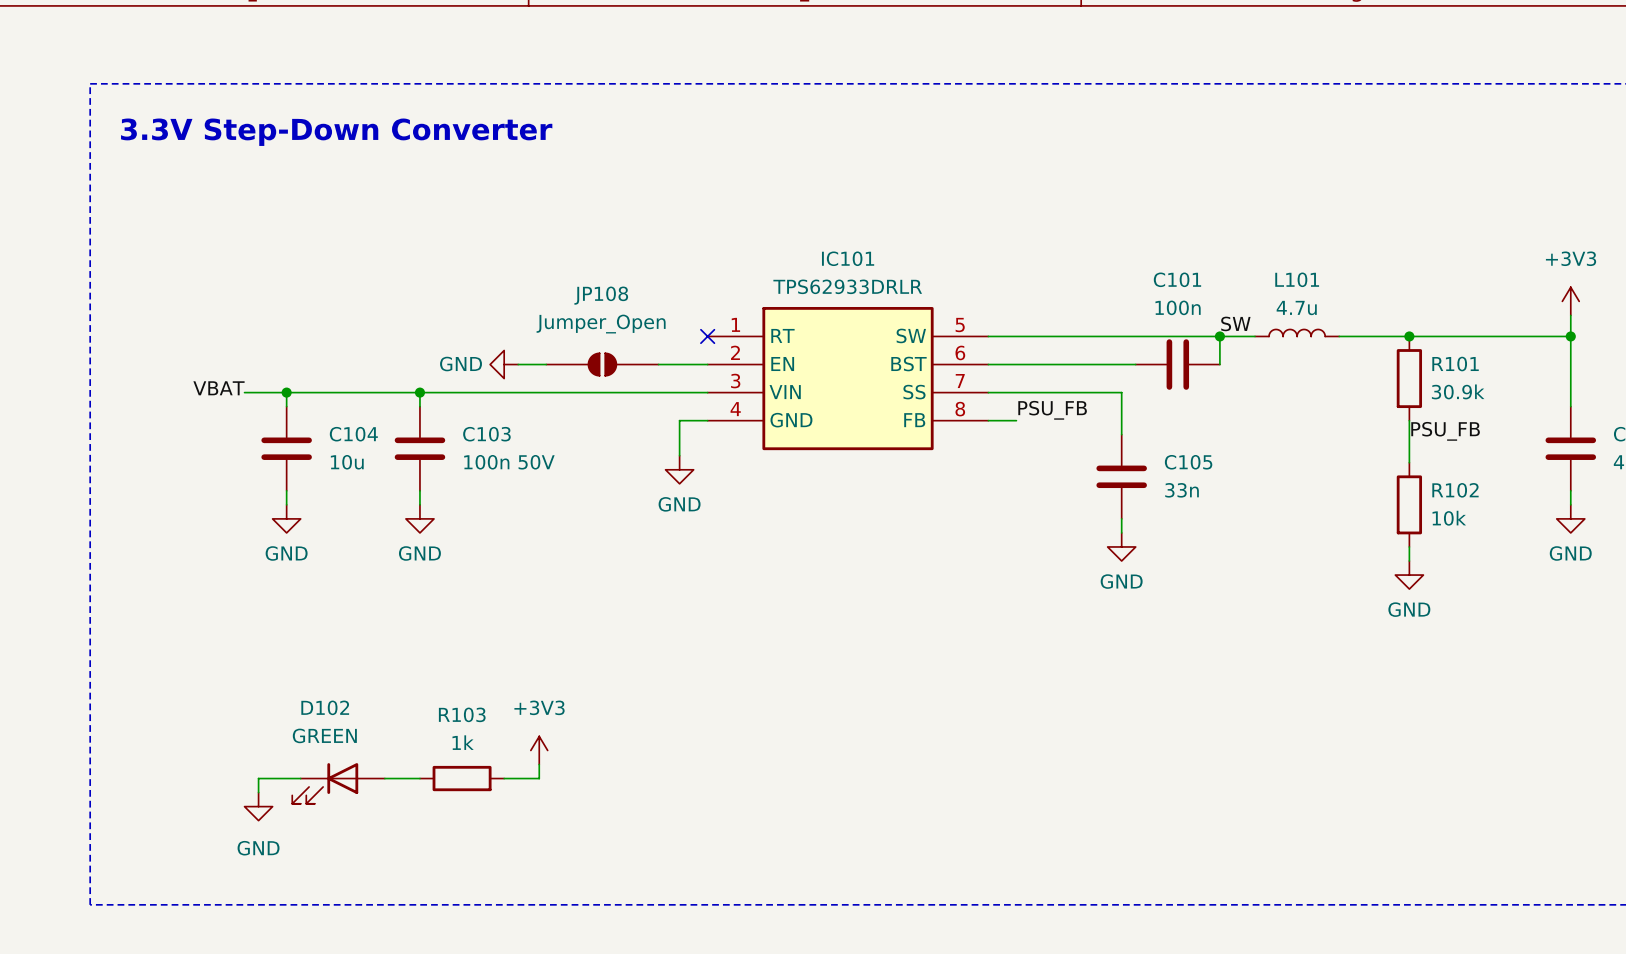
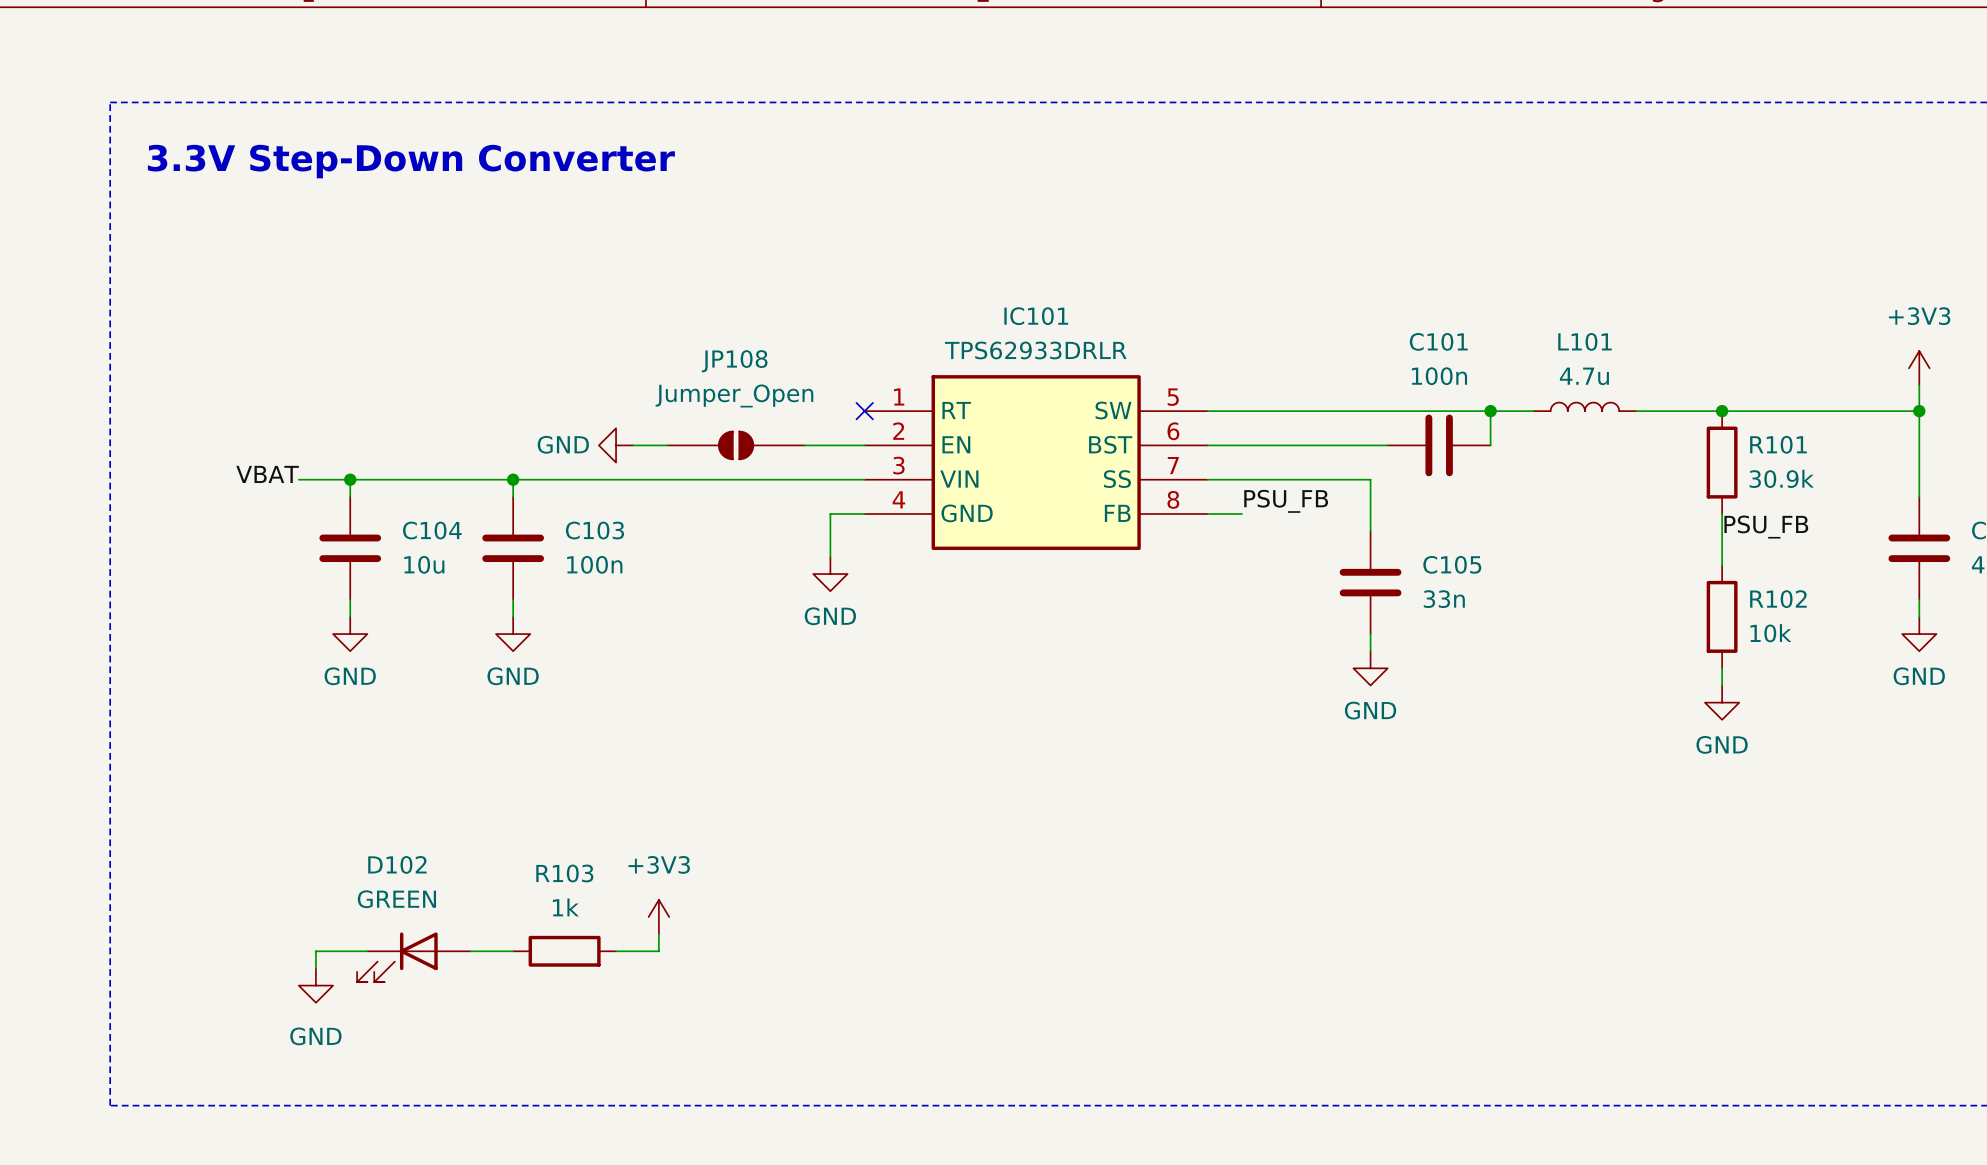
label: SW (1235, 323) -> none
C103 value: 100n 50V (509, 462) -> 100n (594, 564)

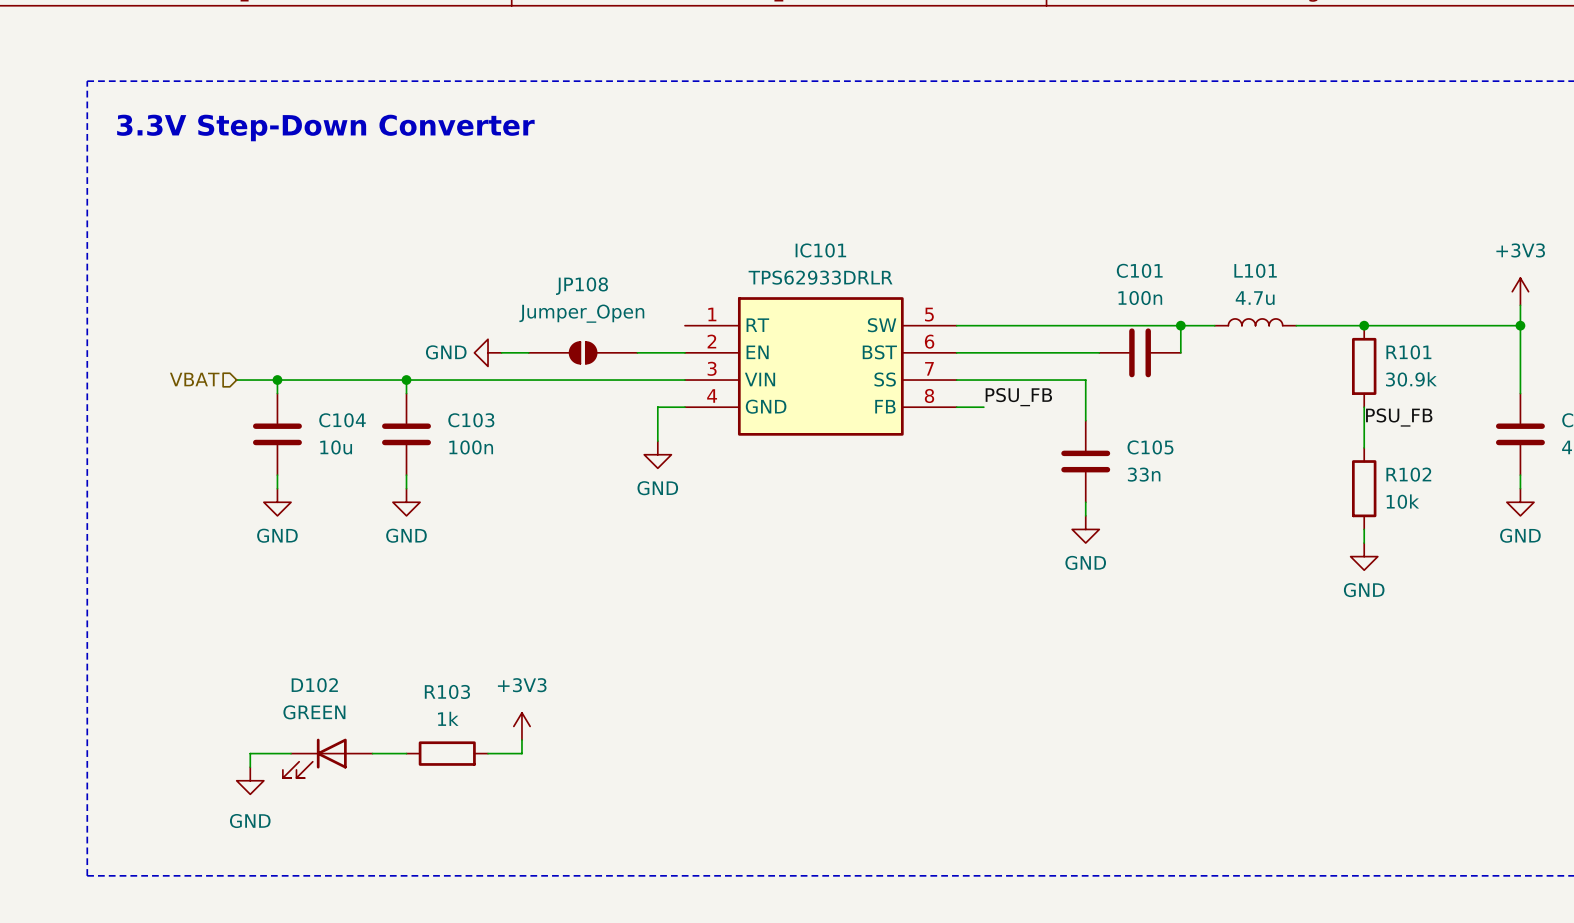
no-connect mark: (864, 411) -> none
label: VBAT (267, 474) -> none
hierarchical label: none -> VBAT (194, 379)

